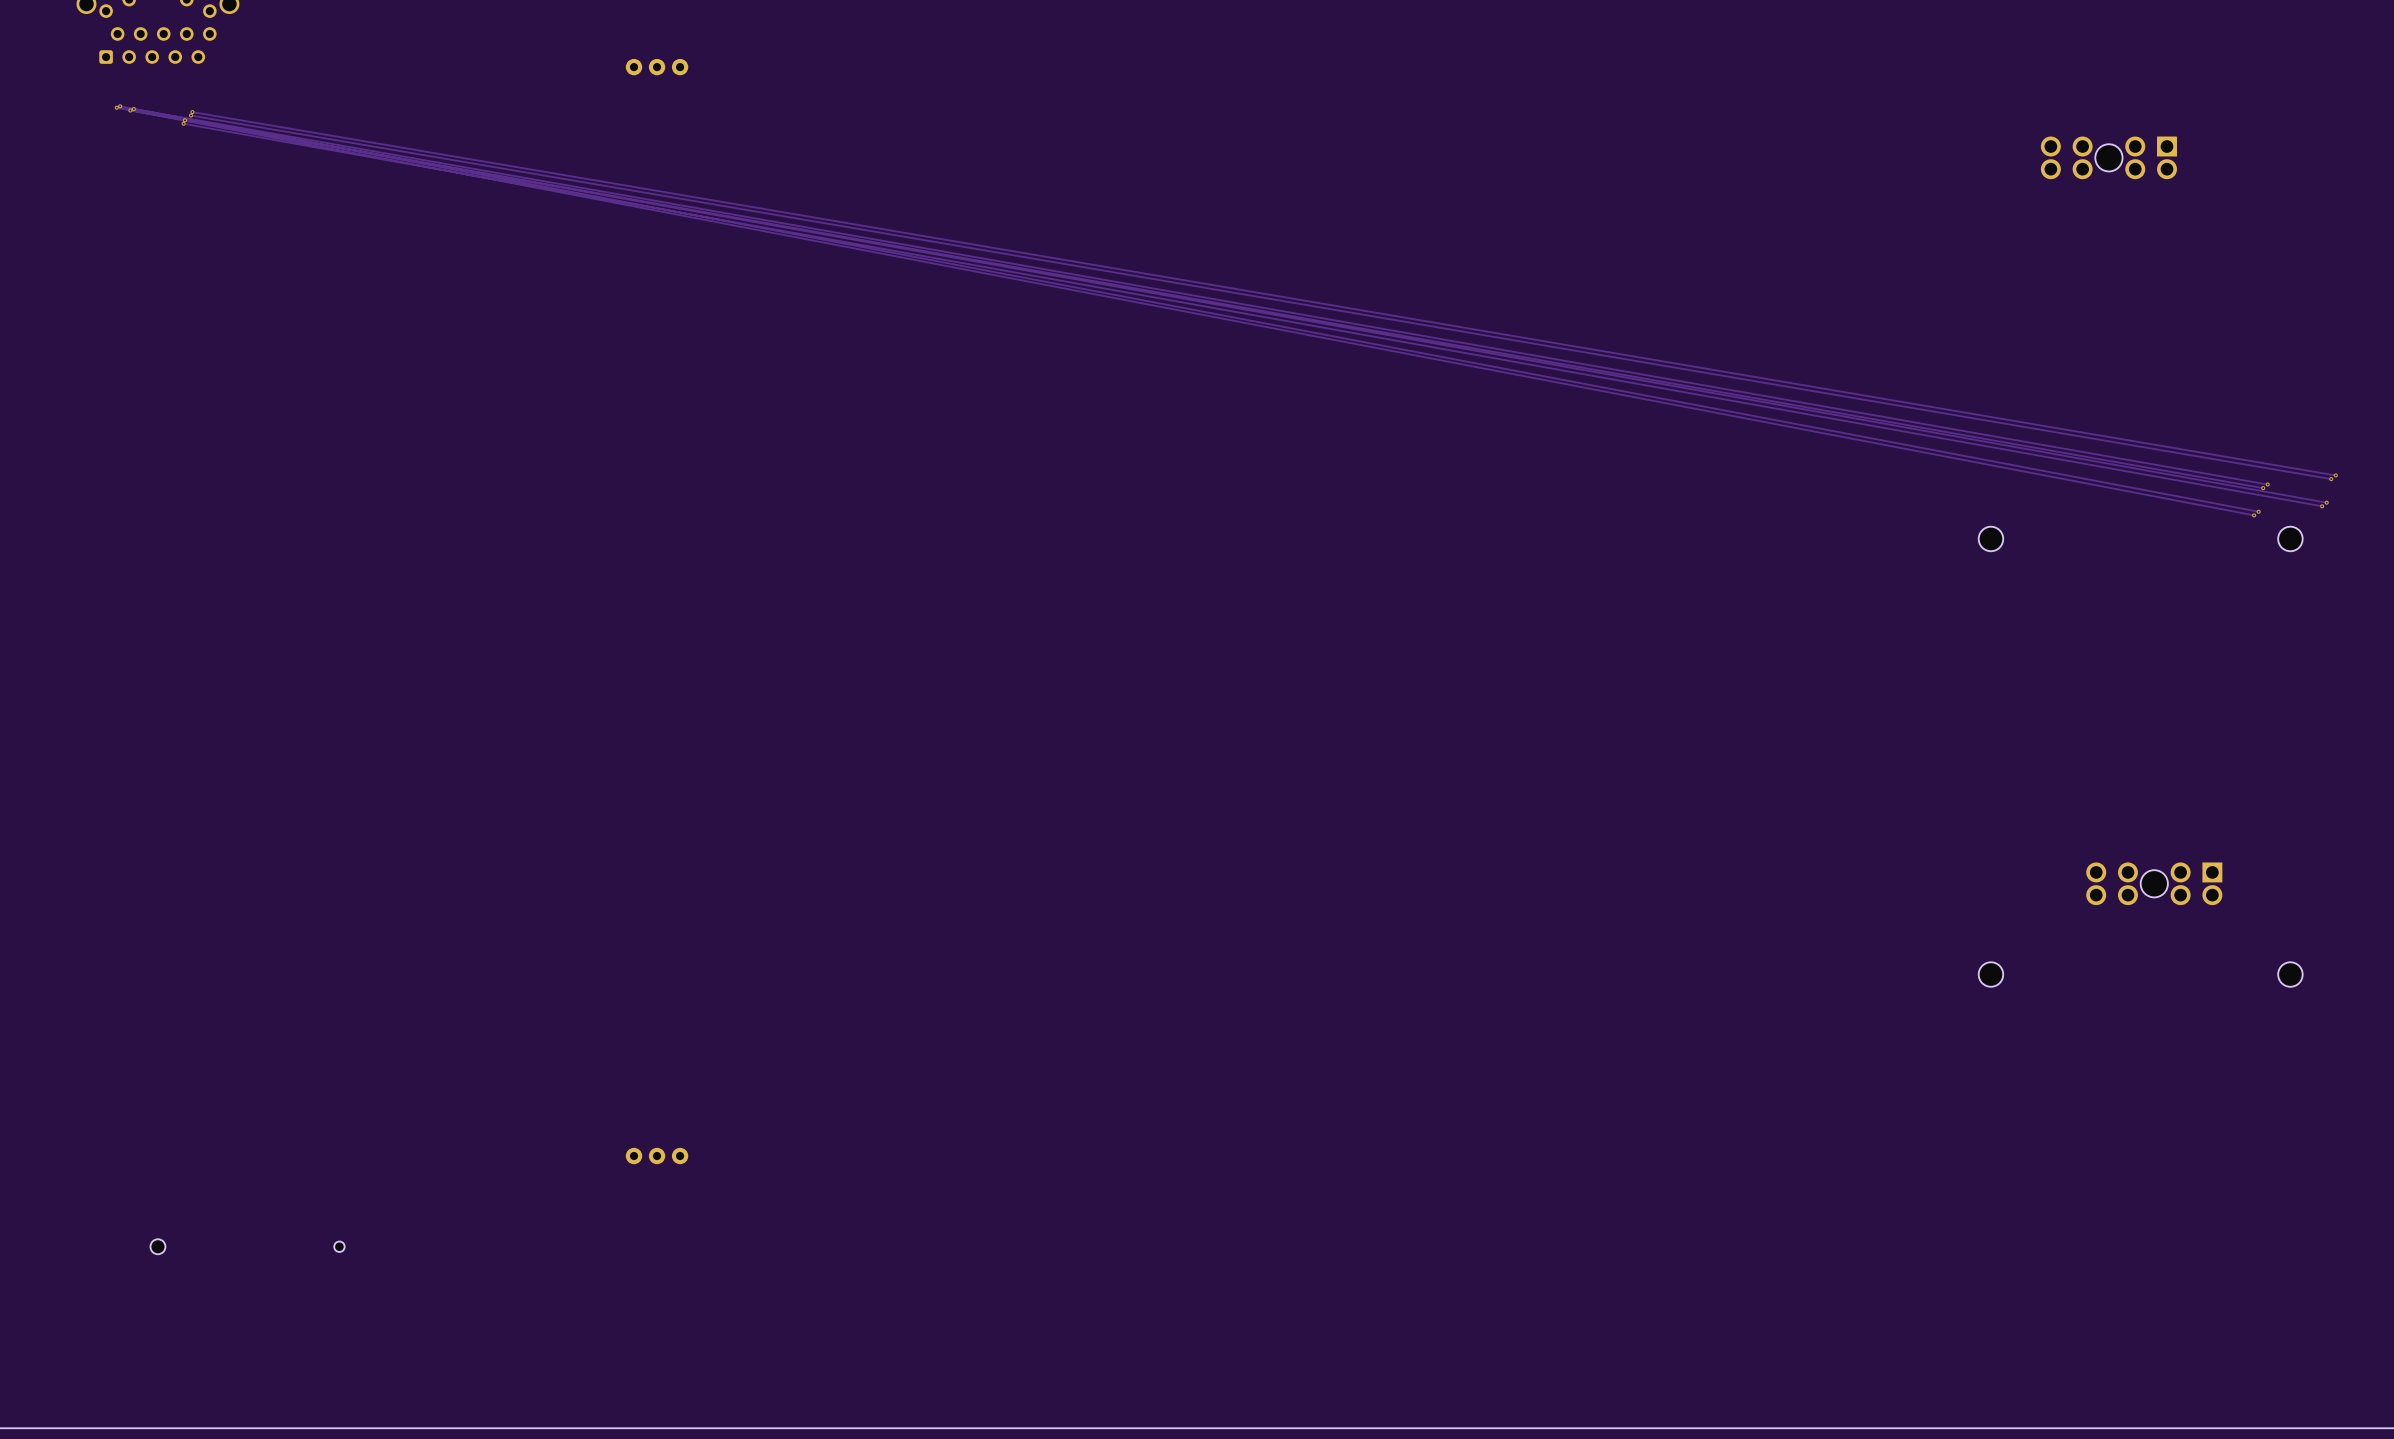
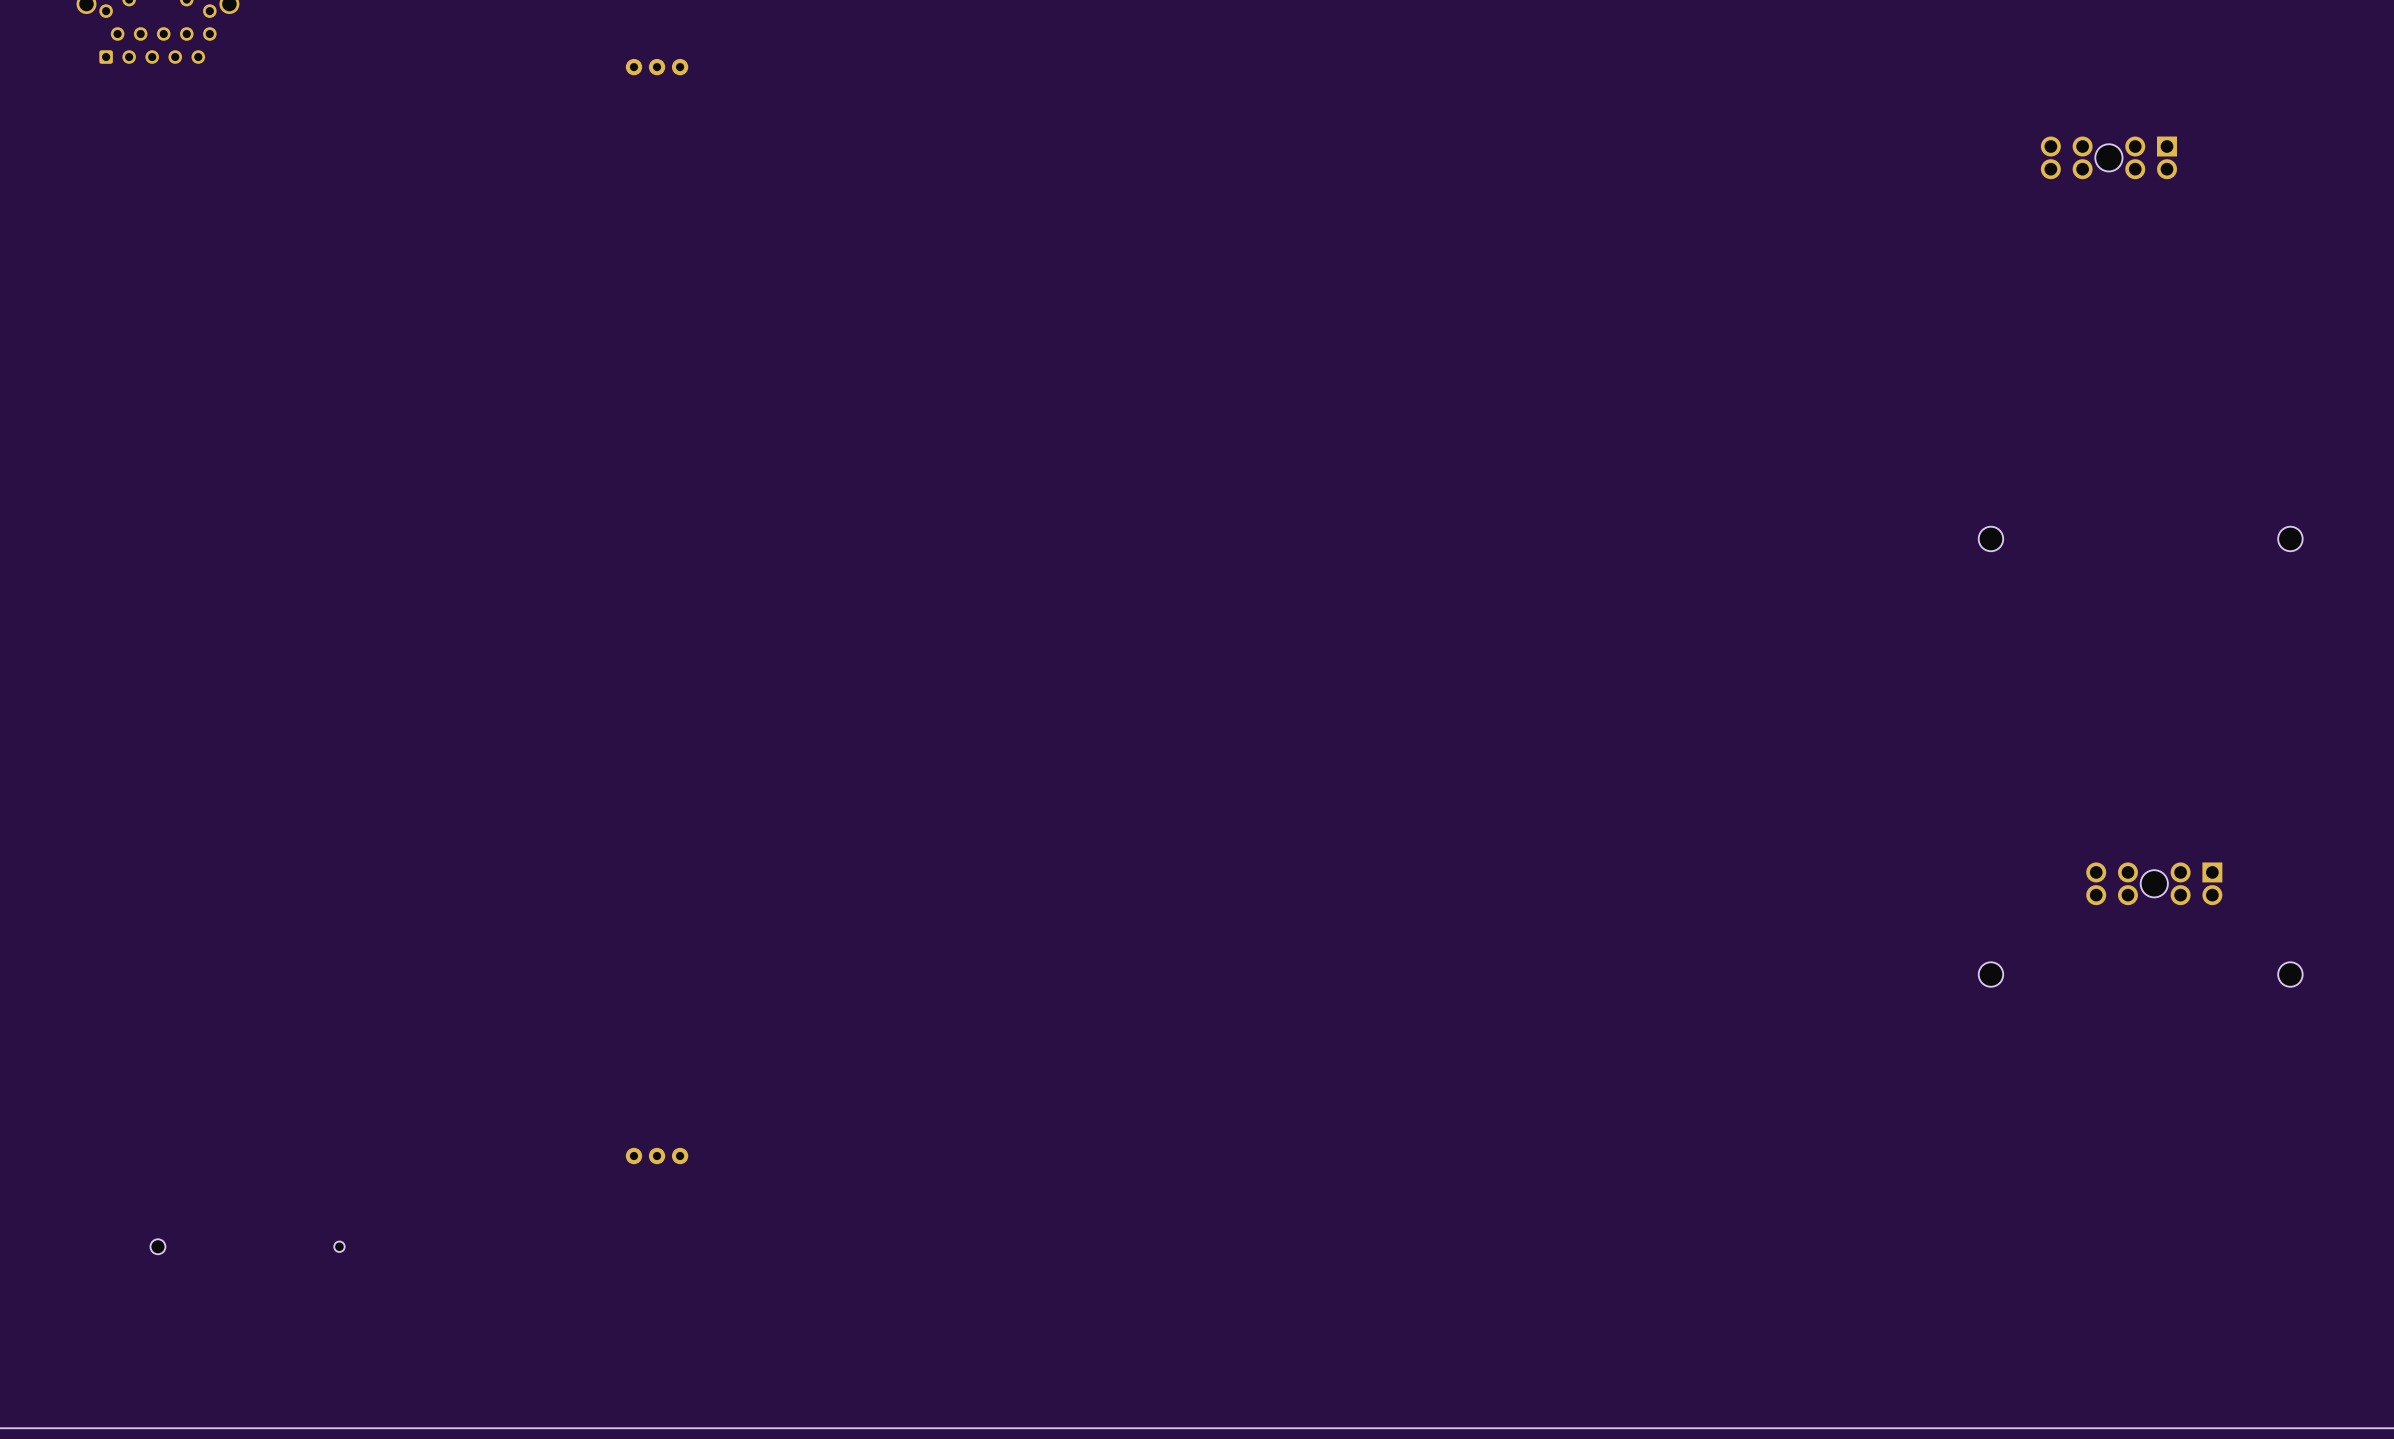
track: (120, 106) (2258, 511) -> none
via: (120, 106) -> none
track: (116, 107) (2254, 515) -> none
via: (116, 107) -> none
track: (133, 109) (2267, 484) -> none
via: (133, 109) -> none
track: (130, 110) (2263, 488) -> none
via: (130, 110) -> none
track: (192, 112) (2335, 475) -> none
via: (192, 112) -> none
track: (190, 115) (2331, 479) -> none
via: (190, 115) -> none
track: (184, 120) (2326, 502) -> none
via: (184, 120) -> none
track: (183, 123) (2322, 506) -> none
via: (183, 123) -> none
via: (2335, 475) -> none
via: (2331, 479) -> none
via: (2267, 484) -> none
via: (2263, 488) -> none
via: (2326, 502) -> none
via: (2322, 506) -> none
via: (2258, 511) -> none
via: (2254, 515) -> none

